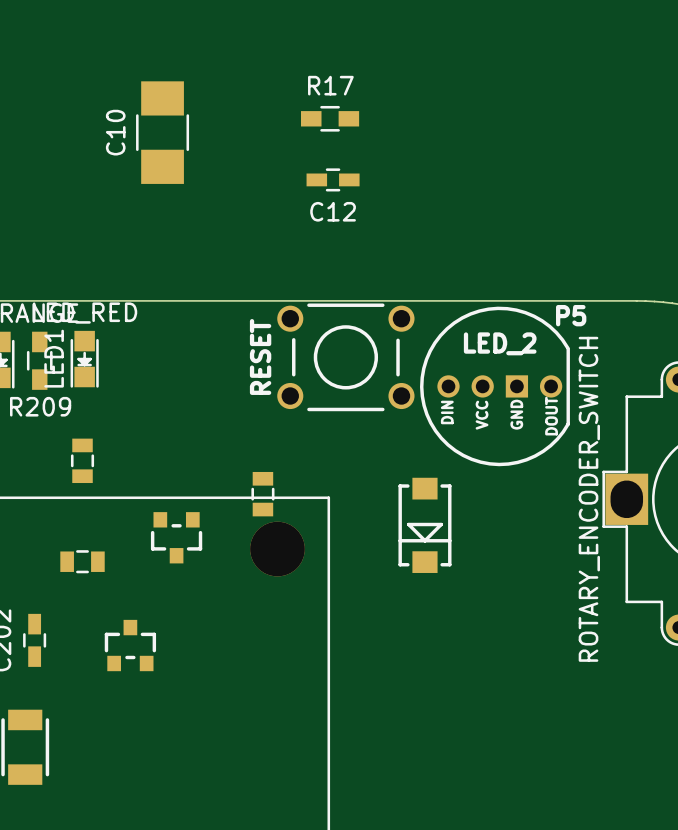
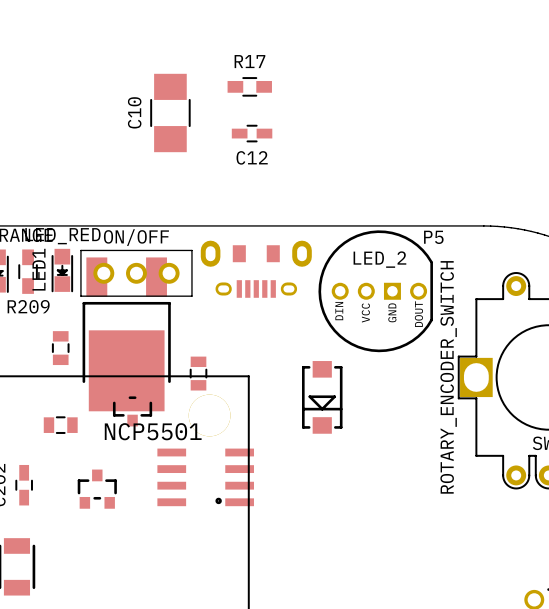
C10 position: (162, 132) -> (170, 112)
part footprint: [277, 303, 415, 412] -> [200, 240, 312, 298]
part value: RESET (260, 356) -> none
part: none -> ON/OFF (136, 273)
part: none -> NCP5501 (126, 334)
part: none -> (205, 477)

